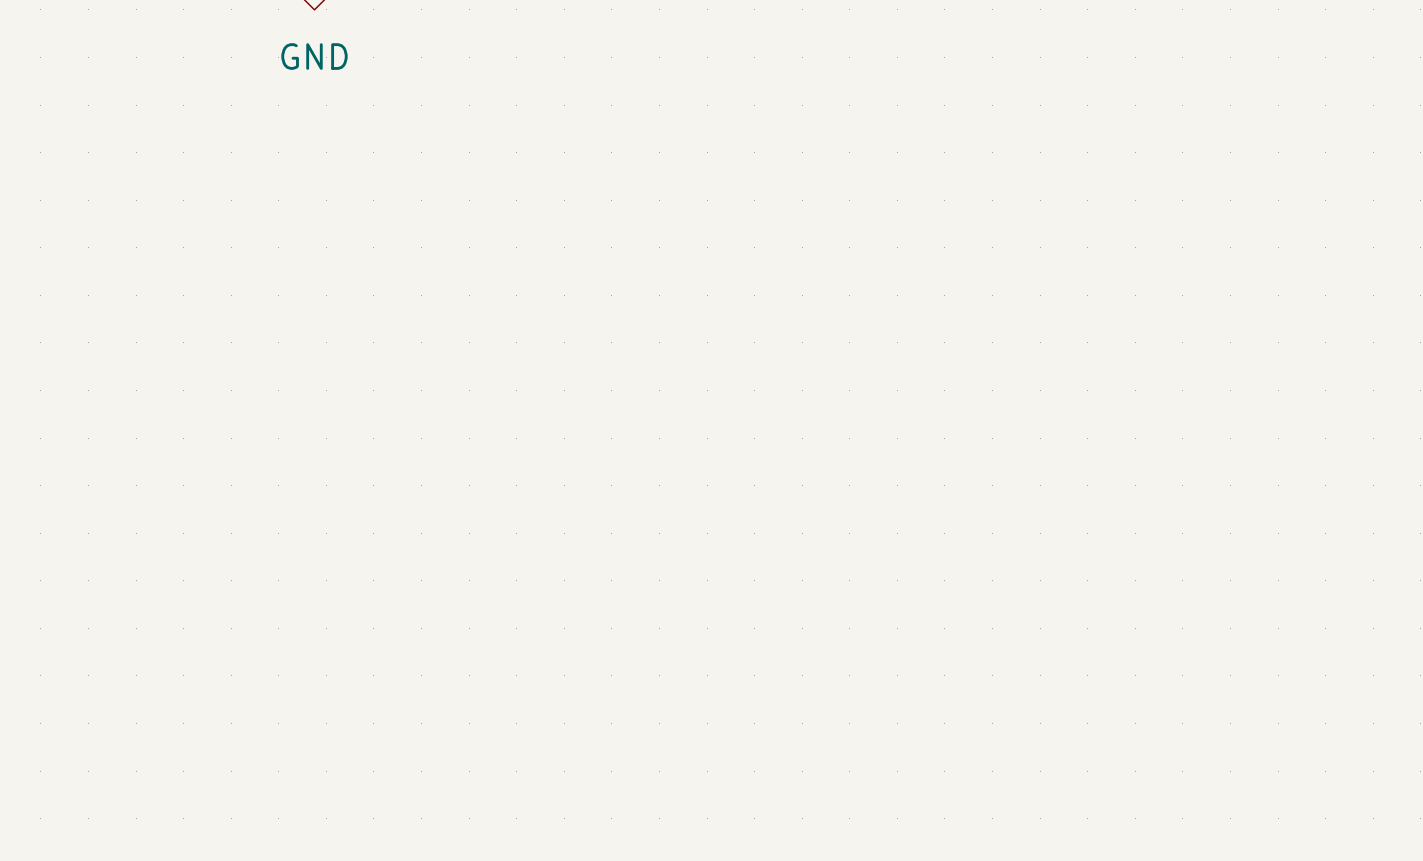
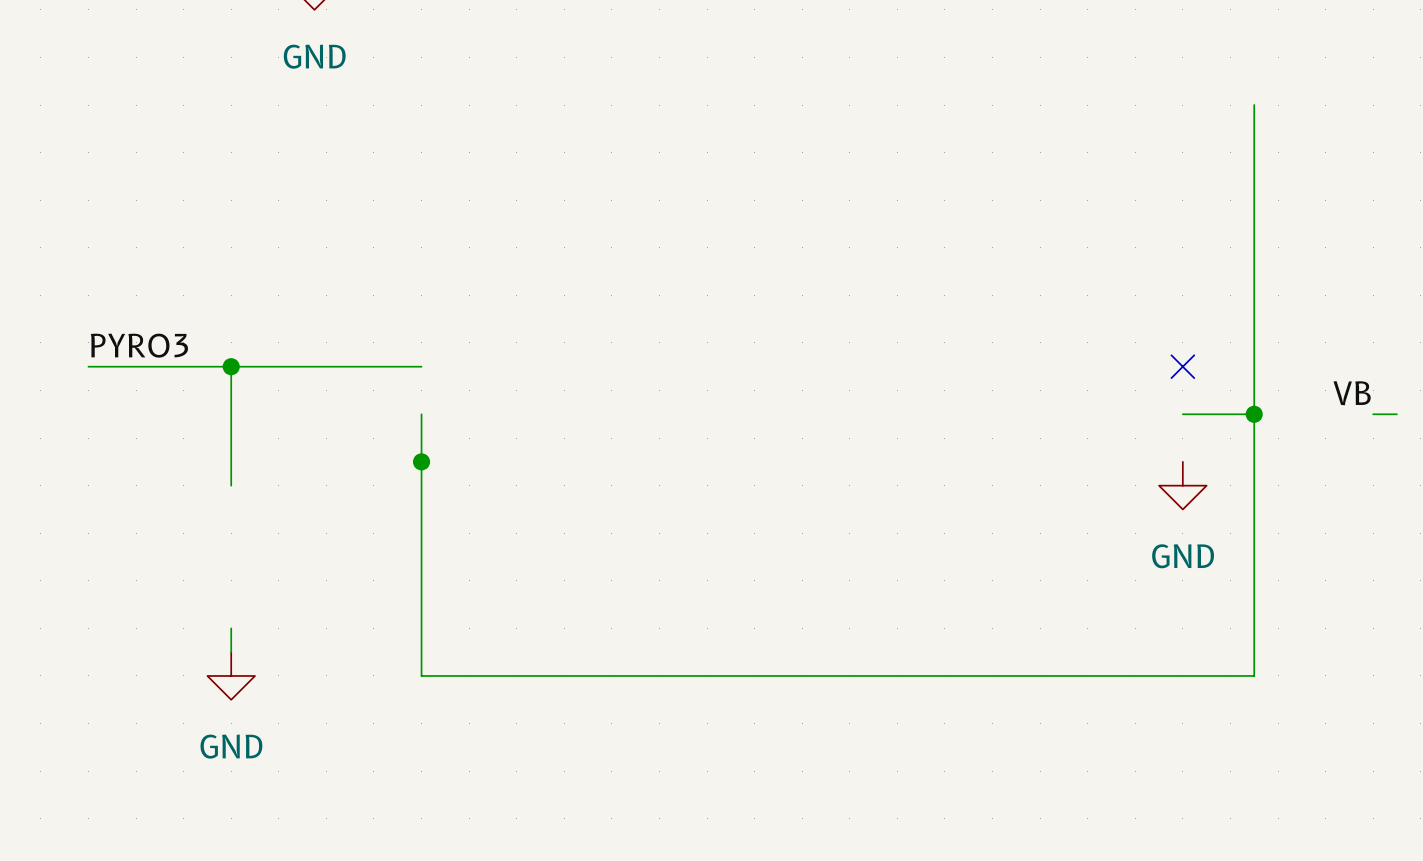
wire: none -> (1254, 105) (1254, 675) (421, 675) (421, 414)
label: none -> PYRO3 (139, 345)
wire: none -> (88, 366) (421, 366)
wire: none -> (231, 366) (231, 485)
junction: none -> (231, 366)
no-connect mark: none -> (1182, 366)
label: none -> VB (1352, 393)
wire: none -> (1182, 414) (1254, 414)
junction: none -> (1254, 414)
wire: none -> (1373, 414) (1396, 414)
junction: none -> (421, 461)
power symbol: none -> GND (1182, 485)
wire: none -> (231, 628) (231, 652)
power symbol: none -> GND (231, 675)

